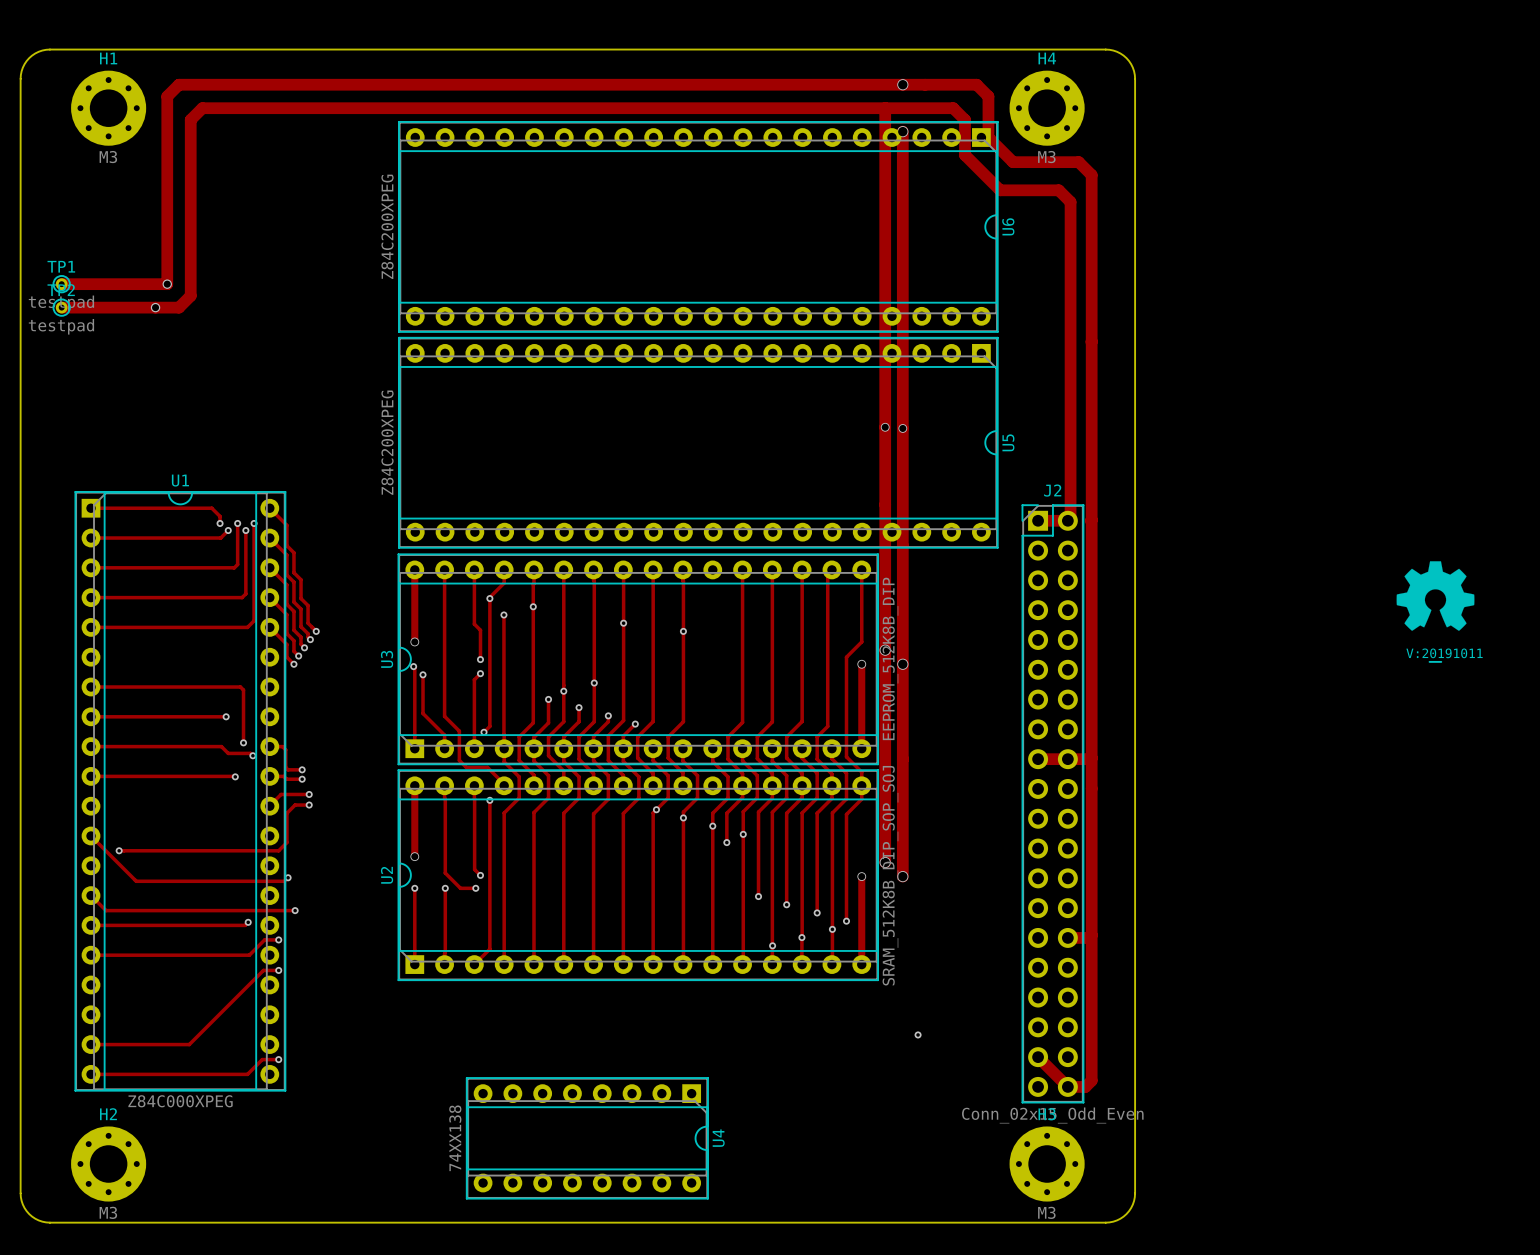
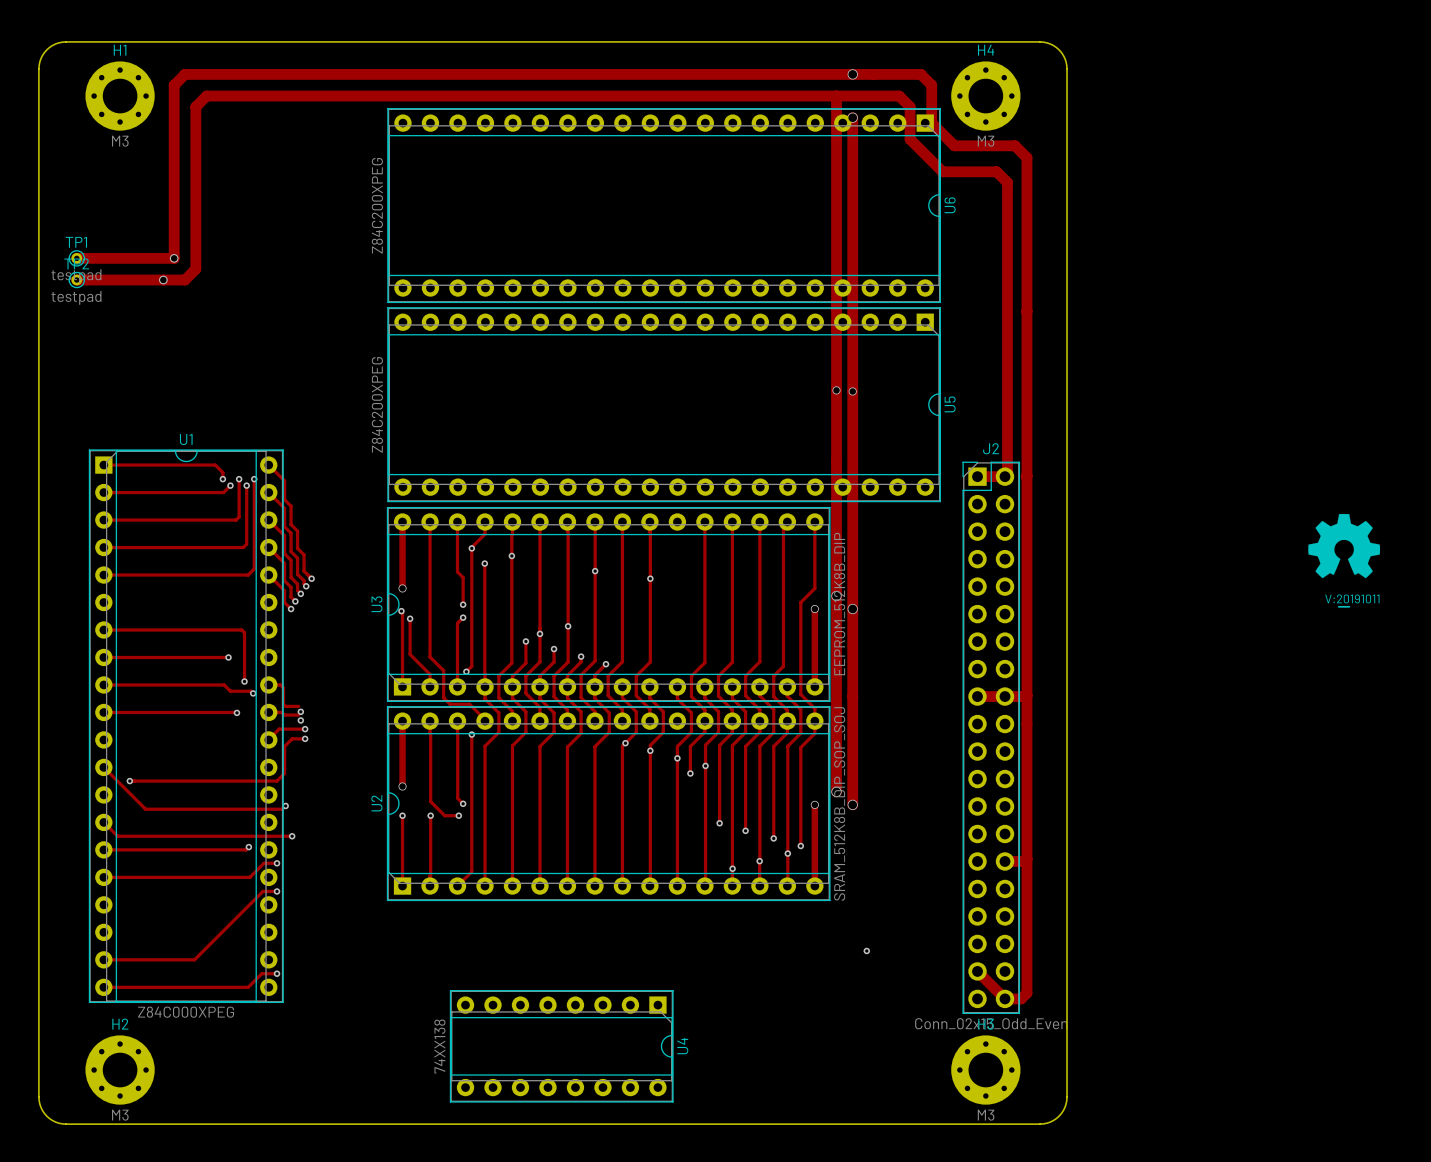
via: (302, 769) -> none
via: none -> (300, 711)
via: (302, 779) -> none
via: none -> (300, 720)

